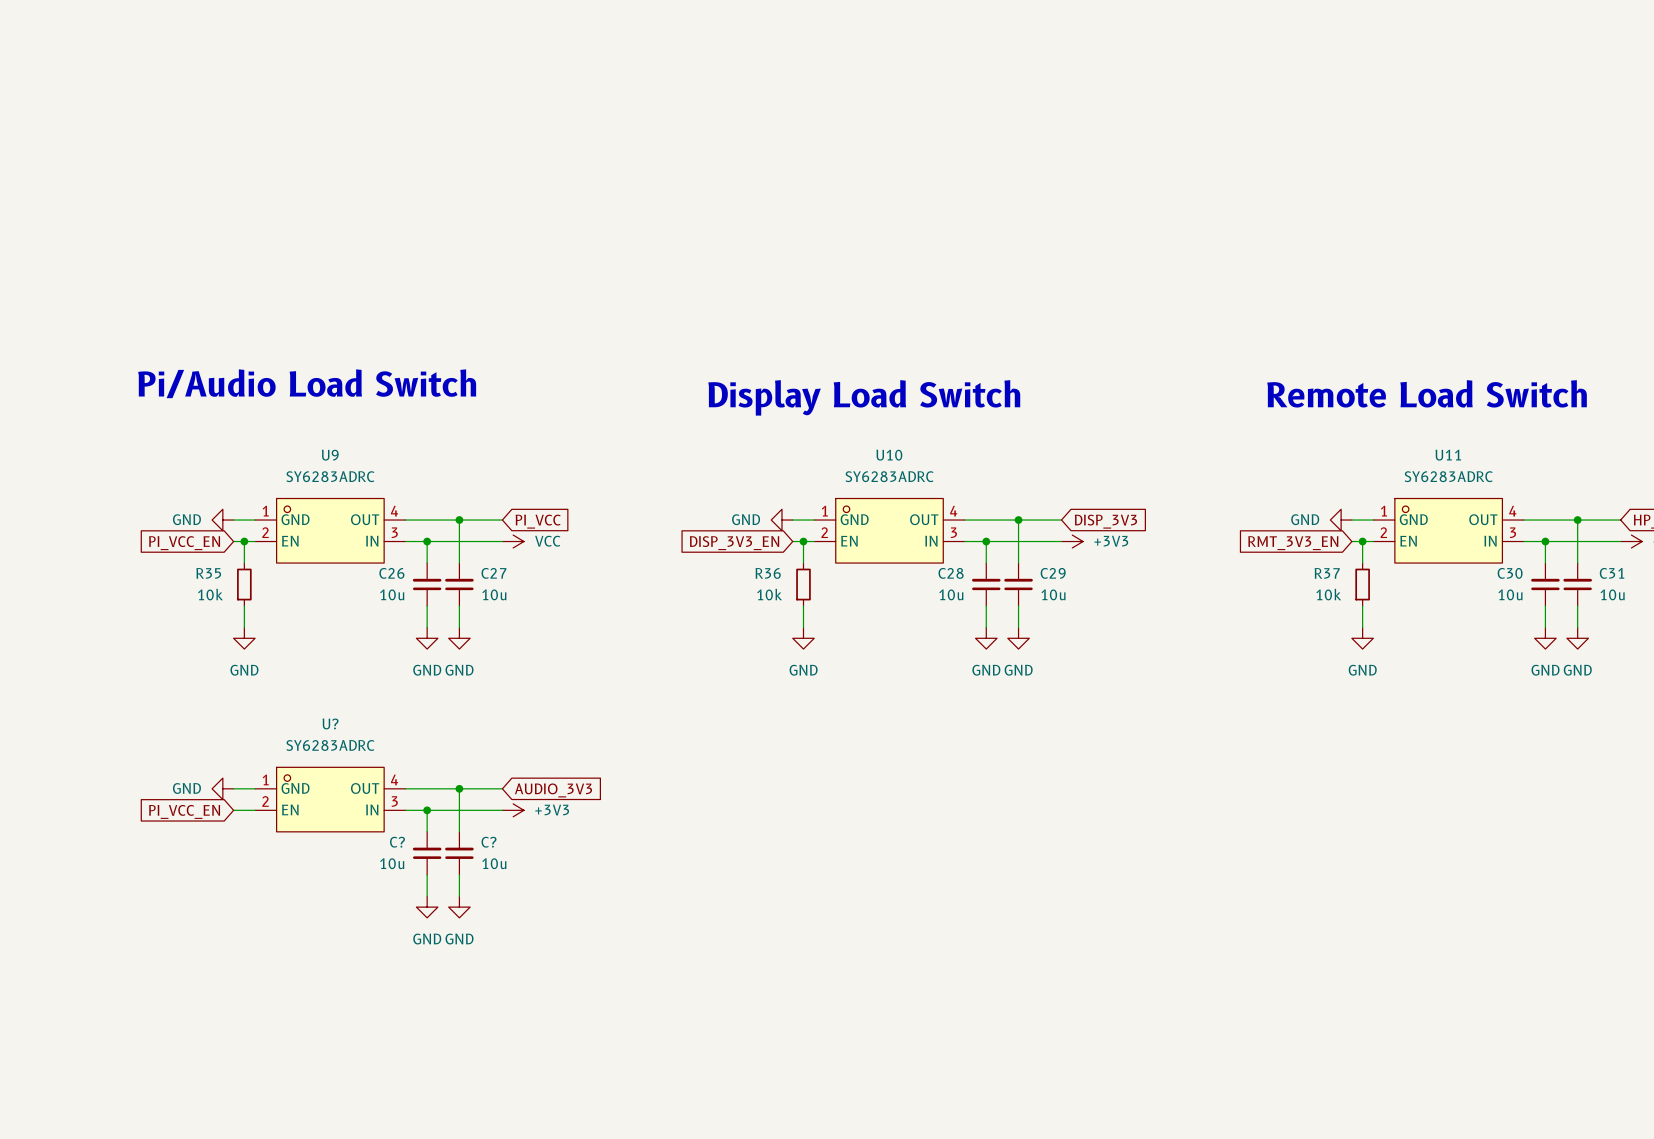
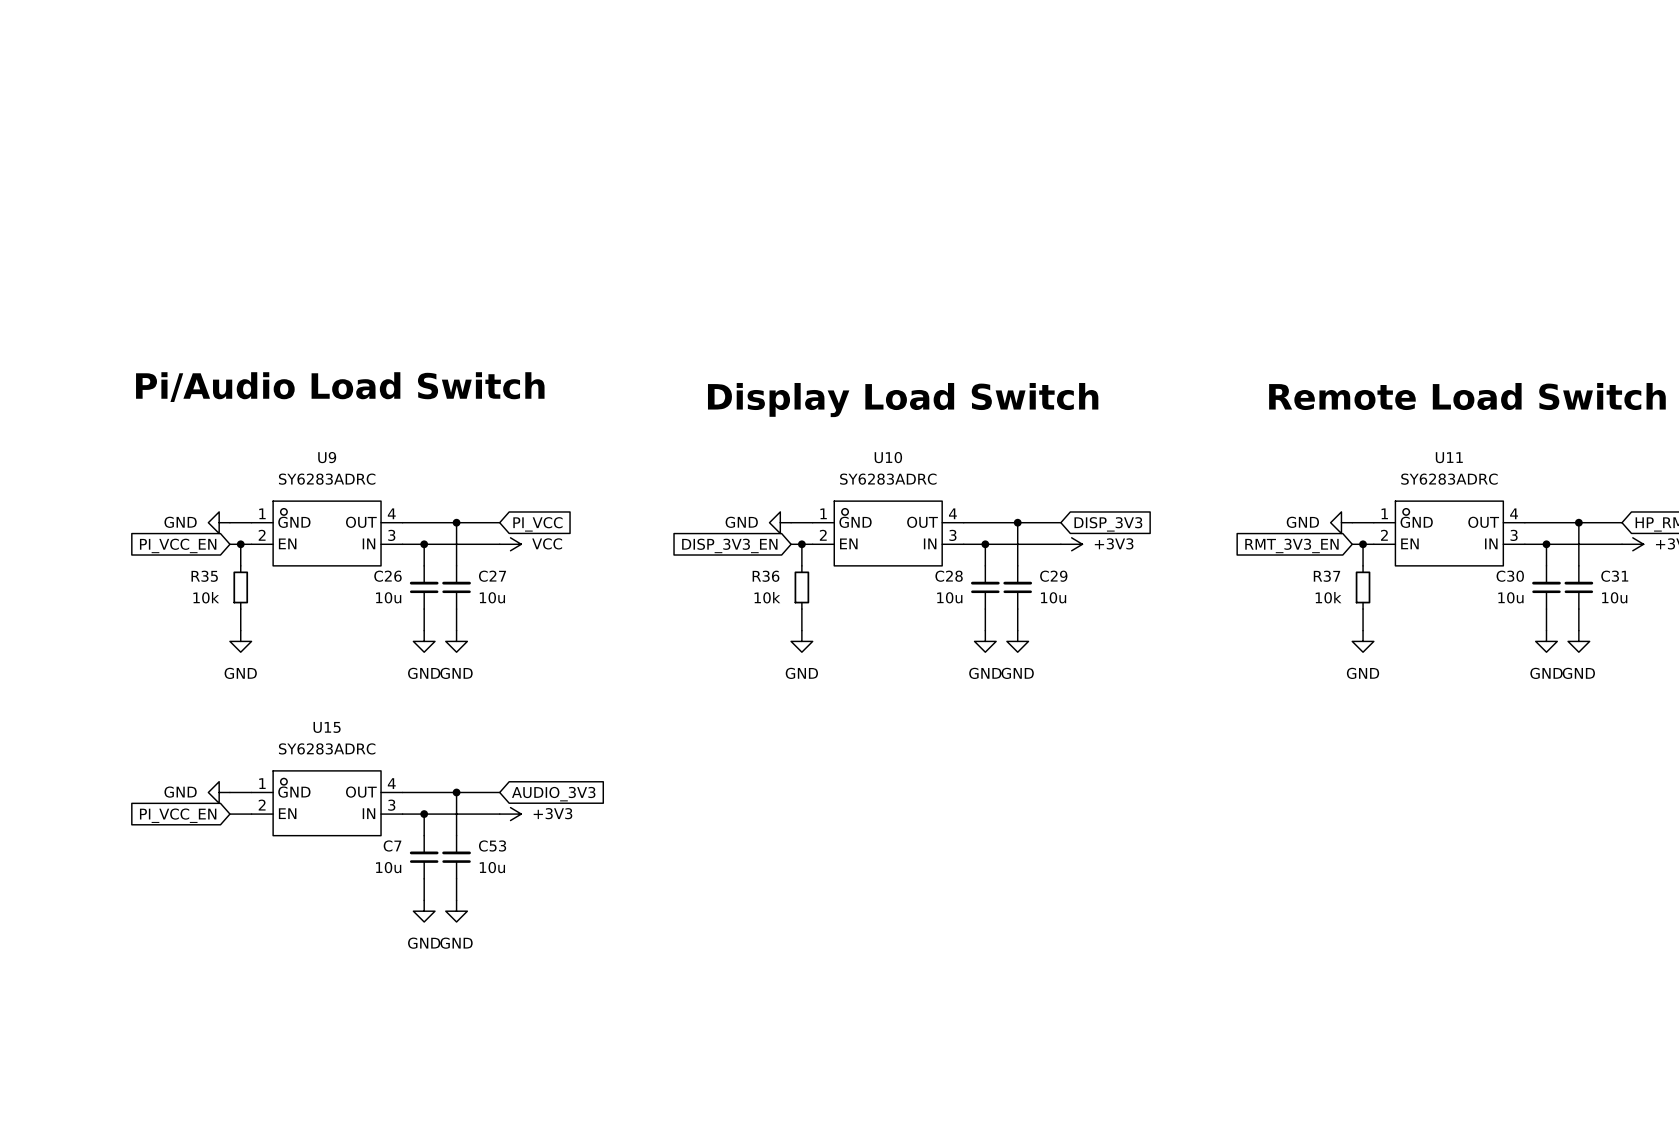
U? name: U? (330, 723) -> U15 (327, 727)
C? name: C? (397, 842) -> C7 (392, 845)
C? name: C? (489, 842) -> C53 (492, 845)

